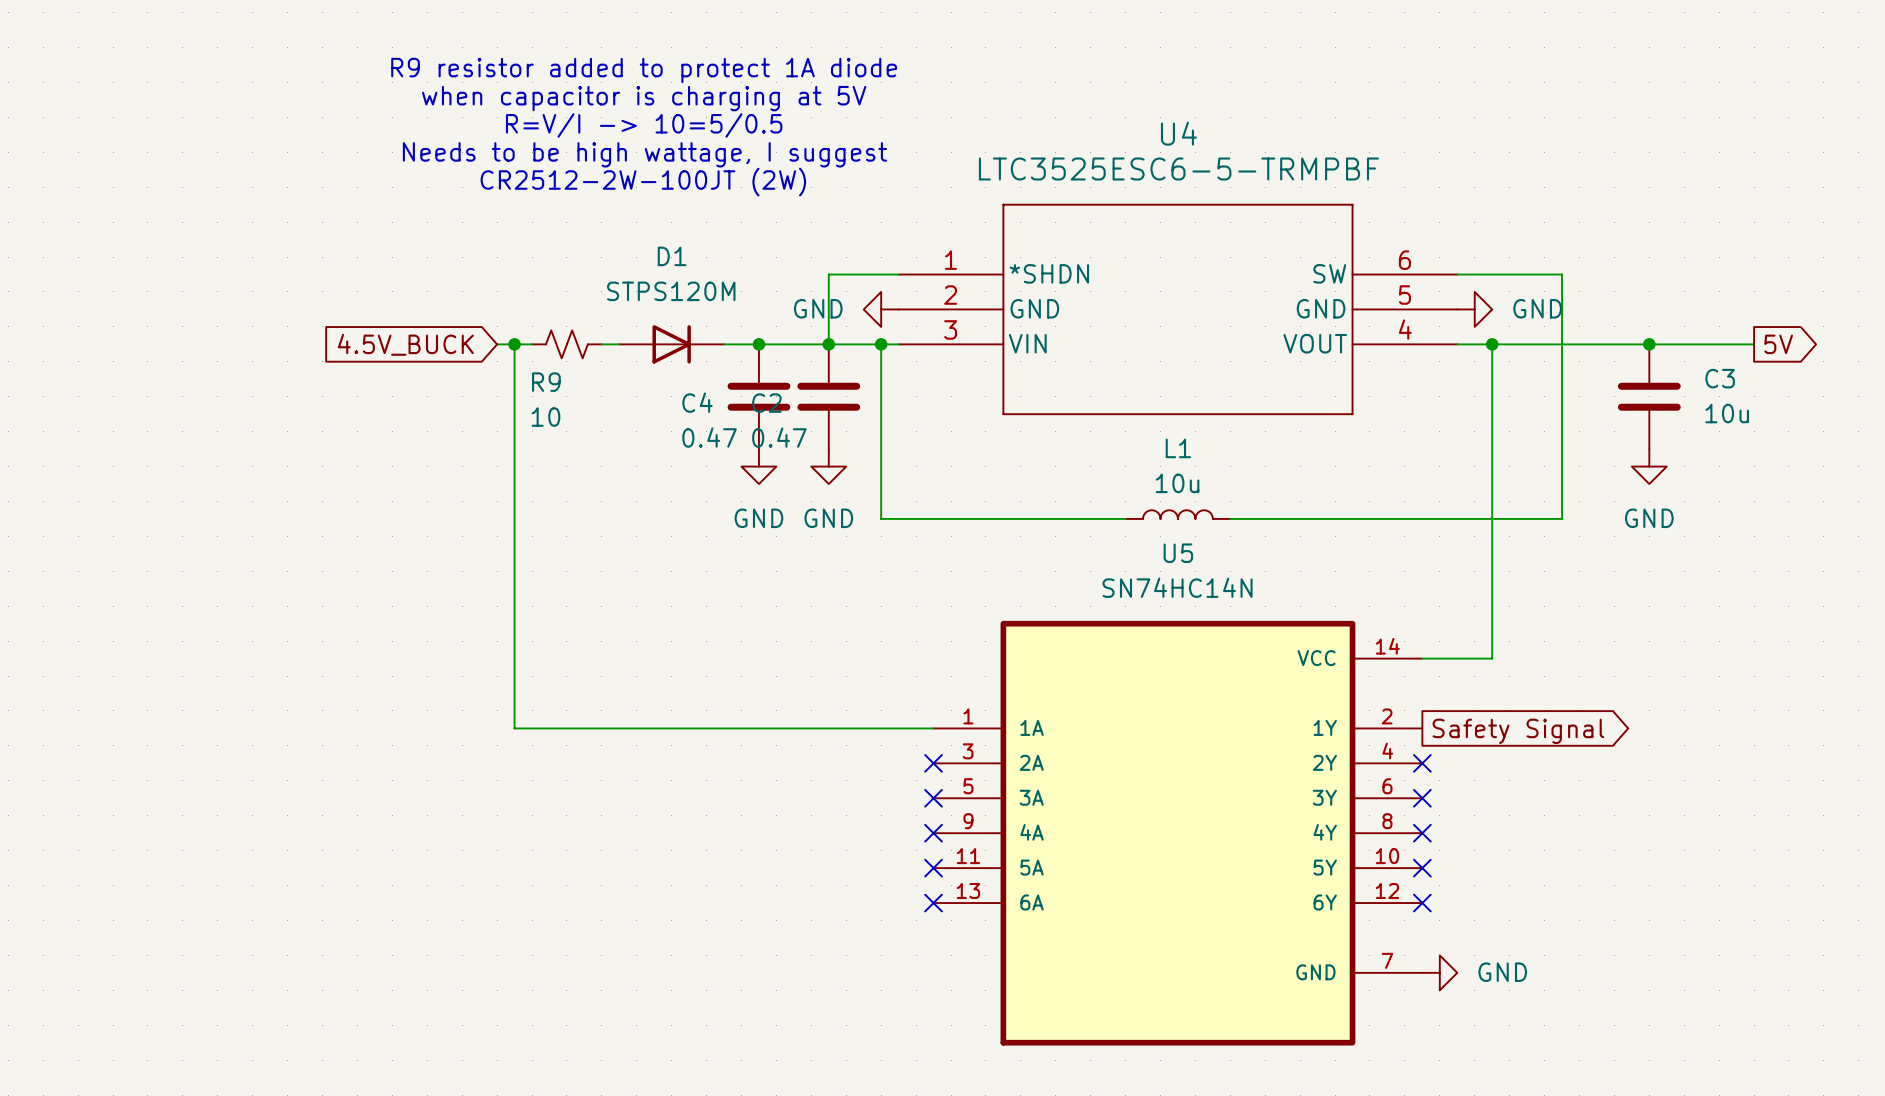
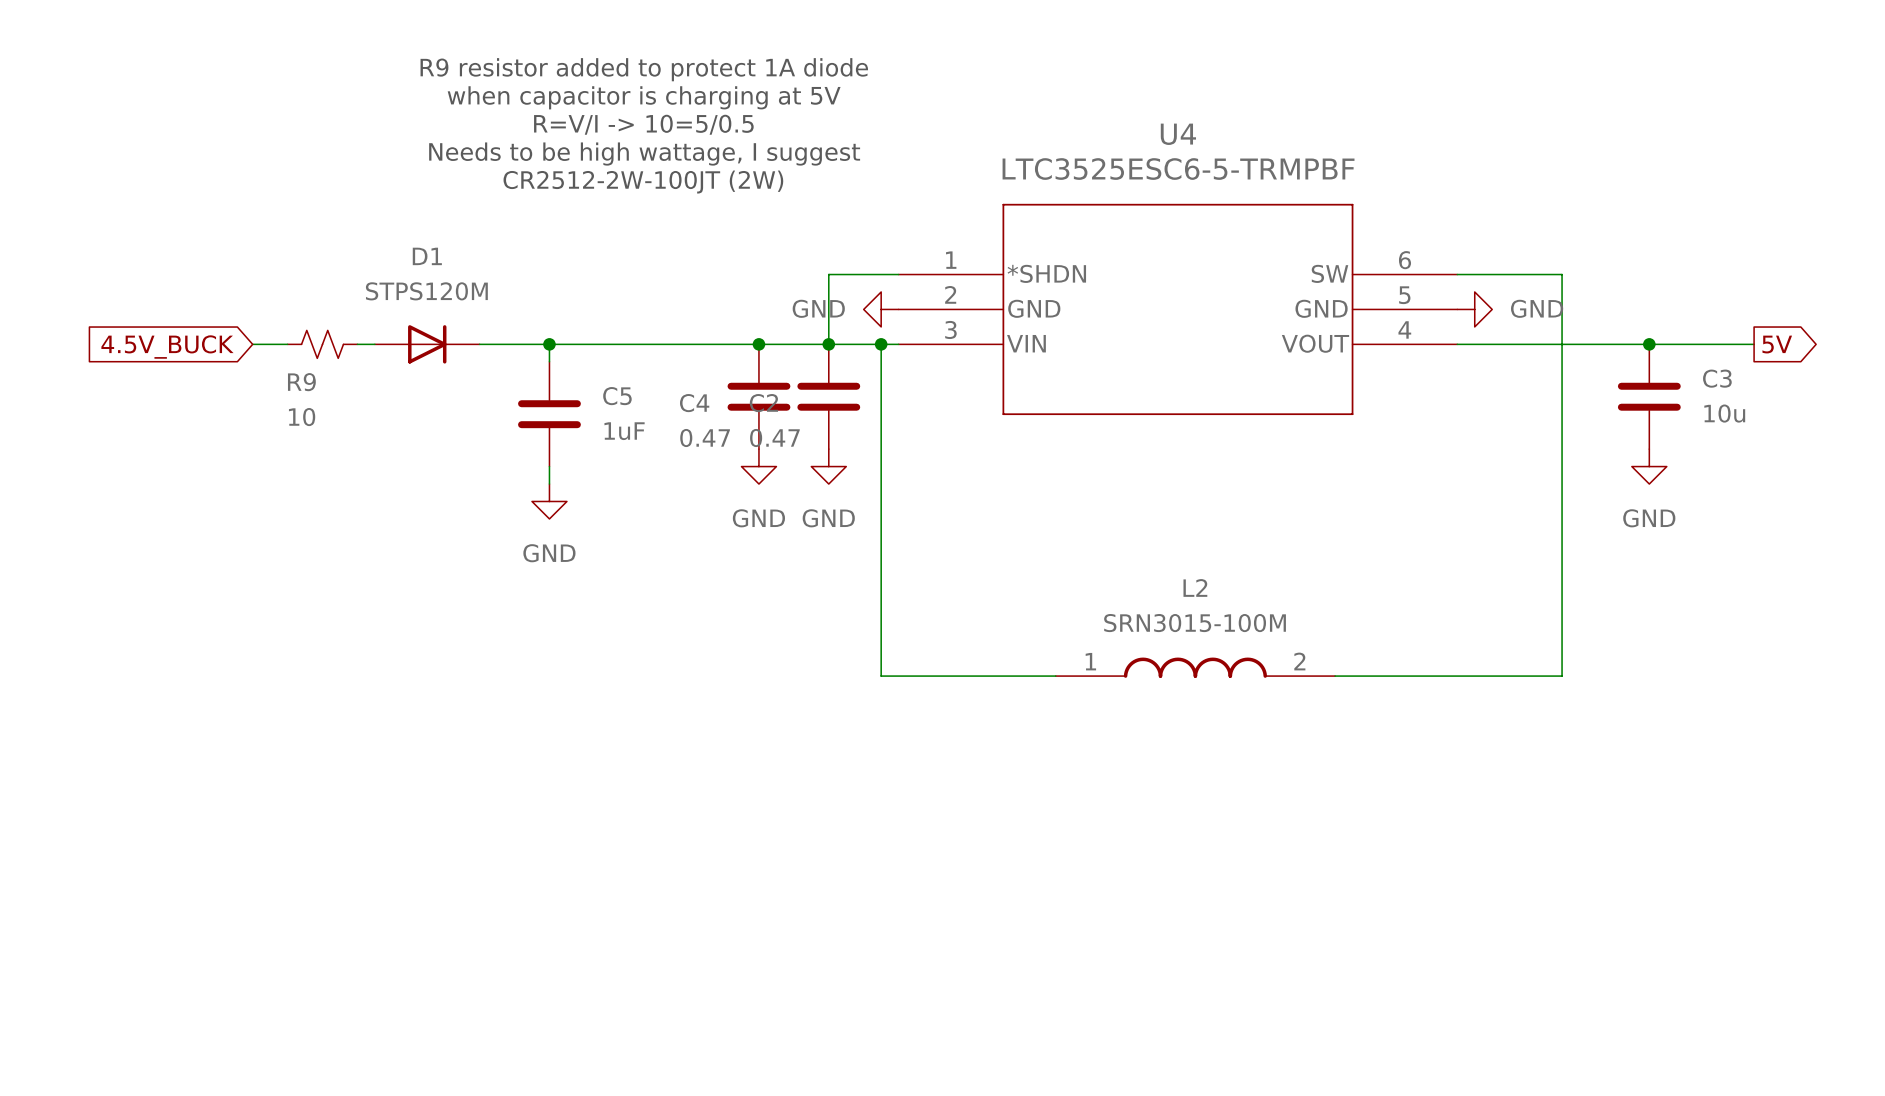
wire: none -> (252, 344) (287, 344)
wire: none -> (357, 344) (374, 344)
global label position: 4.5V_BUCK (405, 344) -> 4.5V_BUCK (167, 347)
wire: none -> (479, 344) (497, 344)
wire: (514, 344) (514, 728) (933, 728) -> none
junction position: (514, 344) -> (549, 344)
wire: none -> (532, 344) (601, 344)
wire: none -> (549, 344) (549, 361)
R9 position: (566, 344) -> (322, 344)
D1 position: (671, 344) -> (427, 344)
wire: (1492, 344) (1492, 658) (1422, 658) -> none
junction: (1492, 344) -> none
C5: none -> 1uF (549, 414)
wire: none -> (549, 466) (549, 484)
power symbol: none -> GND (549, 501)
L1: 10u (1177, 514) -> none
wire: (881, 518) (1125, 518) -> (881, 518) (881, 676) (1055, 676)
wire: (1230, 518) (1562, 518) -> (1335, 676) (1562, 676) (1562, 518)
L2: none -> SRN3015-100M (1195, 667)
global label: Safety Signal (1518, 731) -> none
no-connect mark: (933, 763) -> none
no-connect mark: (1422, 763) -> none
no-connect mark: (933, 798) -> none
no-connect mark: (1422, 798) -> none
no-connect mark: (933, 833) -> none
U5: SN74HC14N (1177, 833) -> none
no-connect mark: (1422, 833) -> none
no-connect mark: (933, 868) -> none
no-connect mark: (1422, 868) -> none
no-connect mark: (933, 903) -> none
no-connect mark: (1422, 903) -> none
power symbol: GND (1439, 972) -> none

